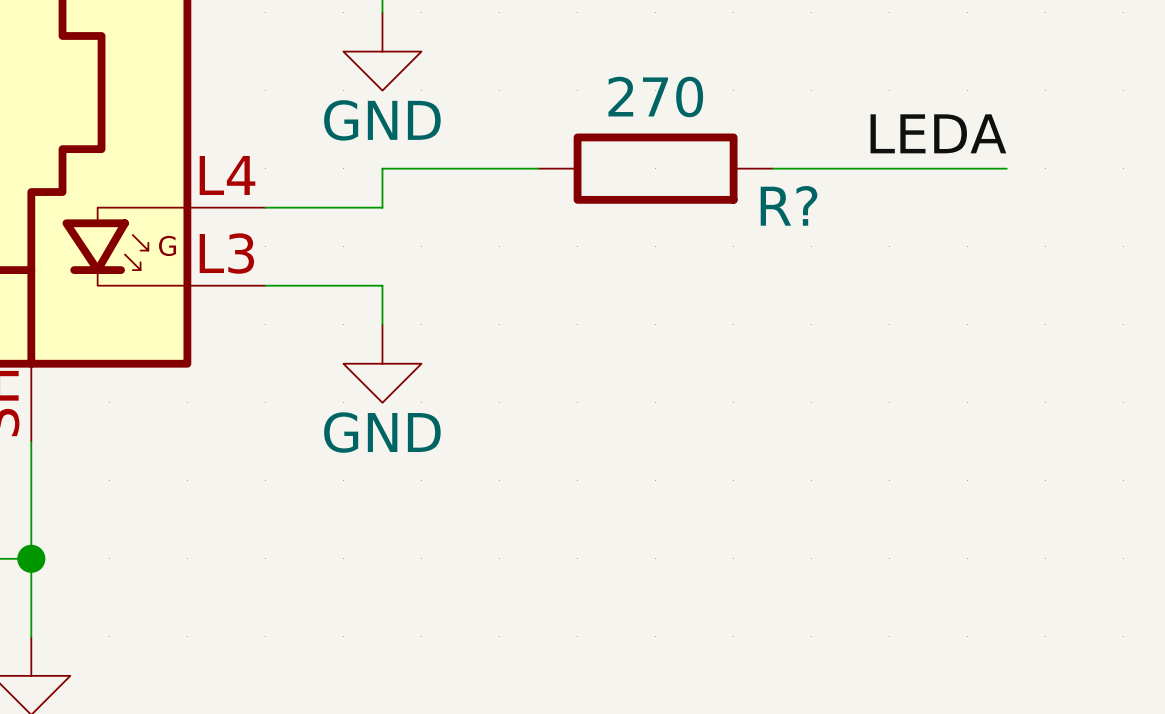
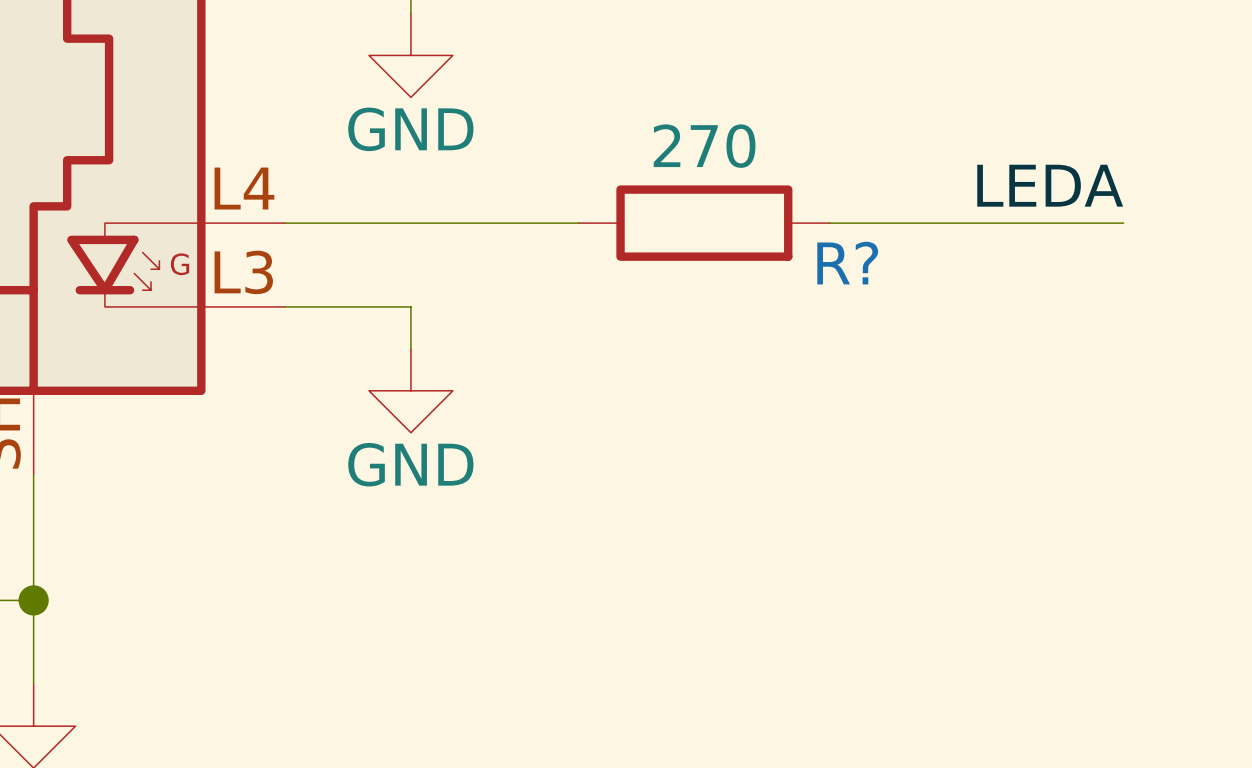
label position: LEDA (938, 133) -> LEDA (1050, 185)
wire: (538, 168) (382, 168) (382, 207) -> (578, 223) (410, 223)
R? position: (655, 168) -> (704, 223)
wire: (772, 168) (1006, 168) -> none
wire: none -> (830, 223) (1123, 223)

